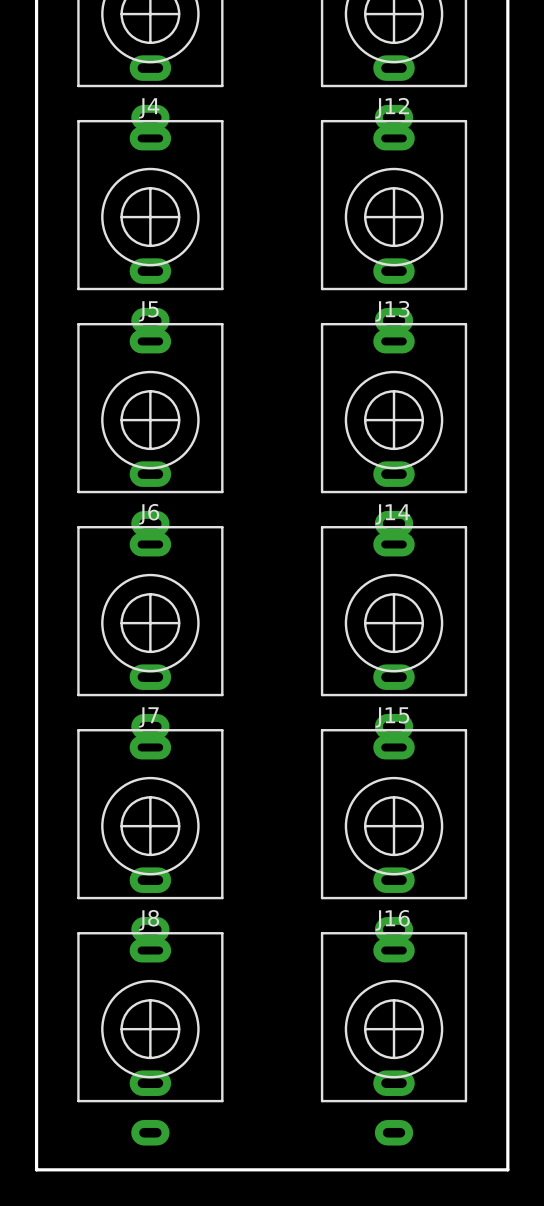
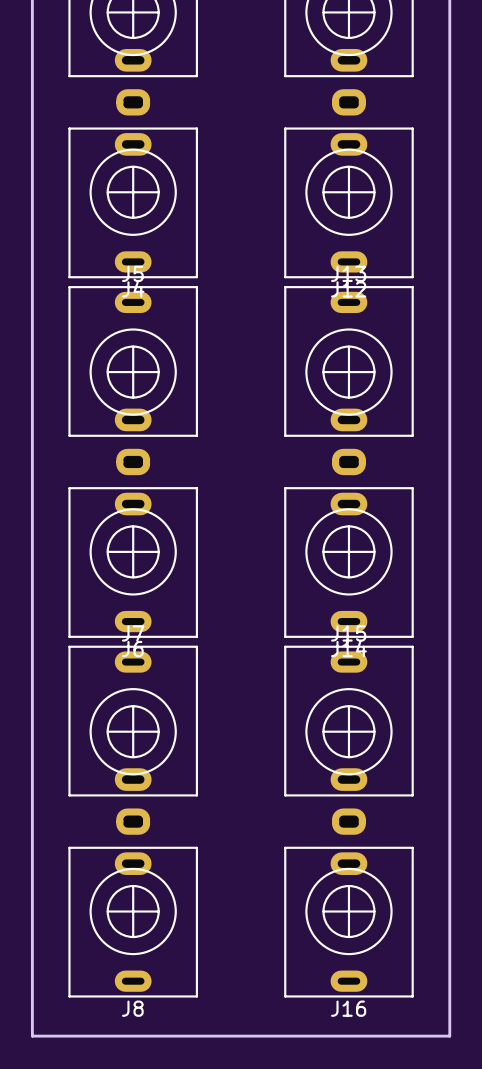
J4 rotation: 0° (150, 226) -> 180° (133, 183)
J12 rotation: 0° (394, 226) -> 180° (348, 183)
J6 rotation: 0° (150, 632) -> 180° (133, 543)
J14 rotation: 0° (394, 632) -> 180° (348, 543)
J8 rotation: 0° (150, 1038) -> 180° (133, 902)
J16 rotation: 0° (394, 1038) -> 180° (348, 902)

